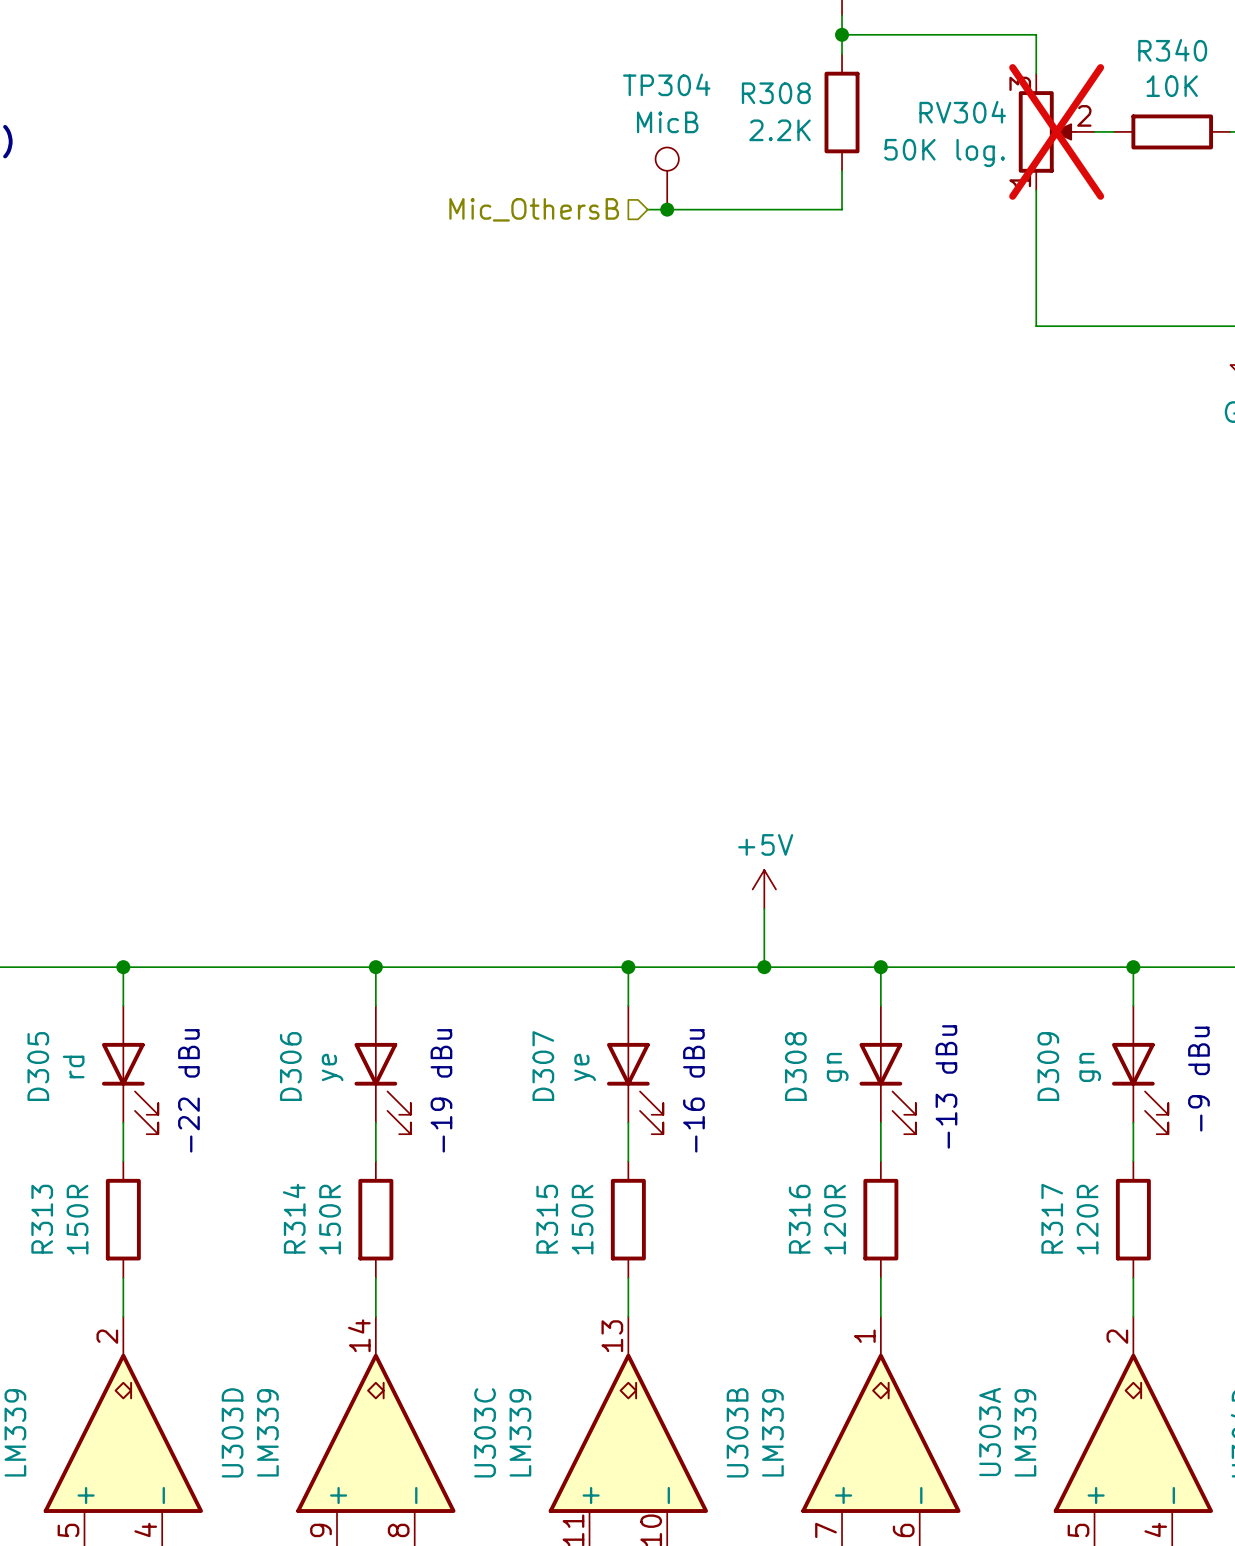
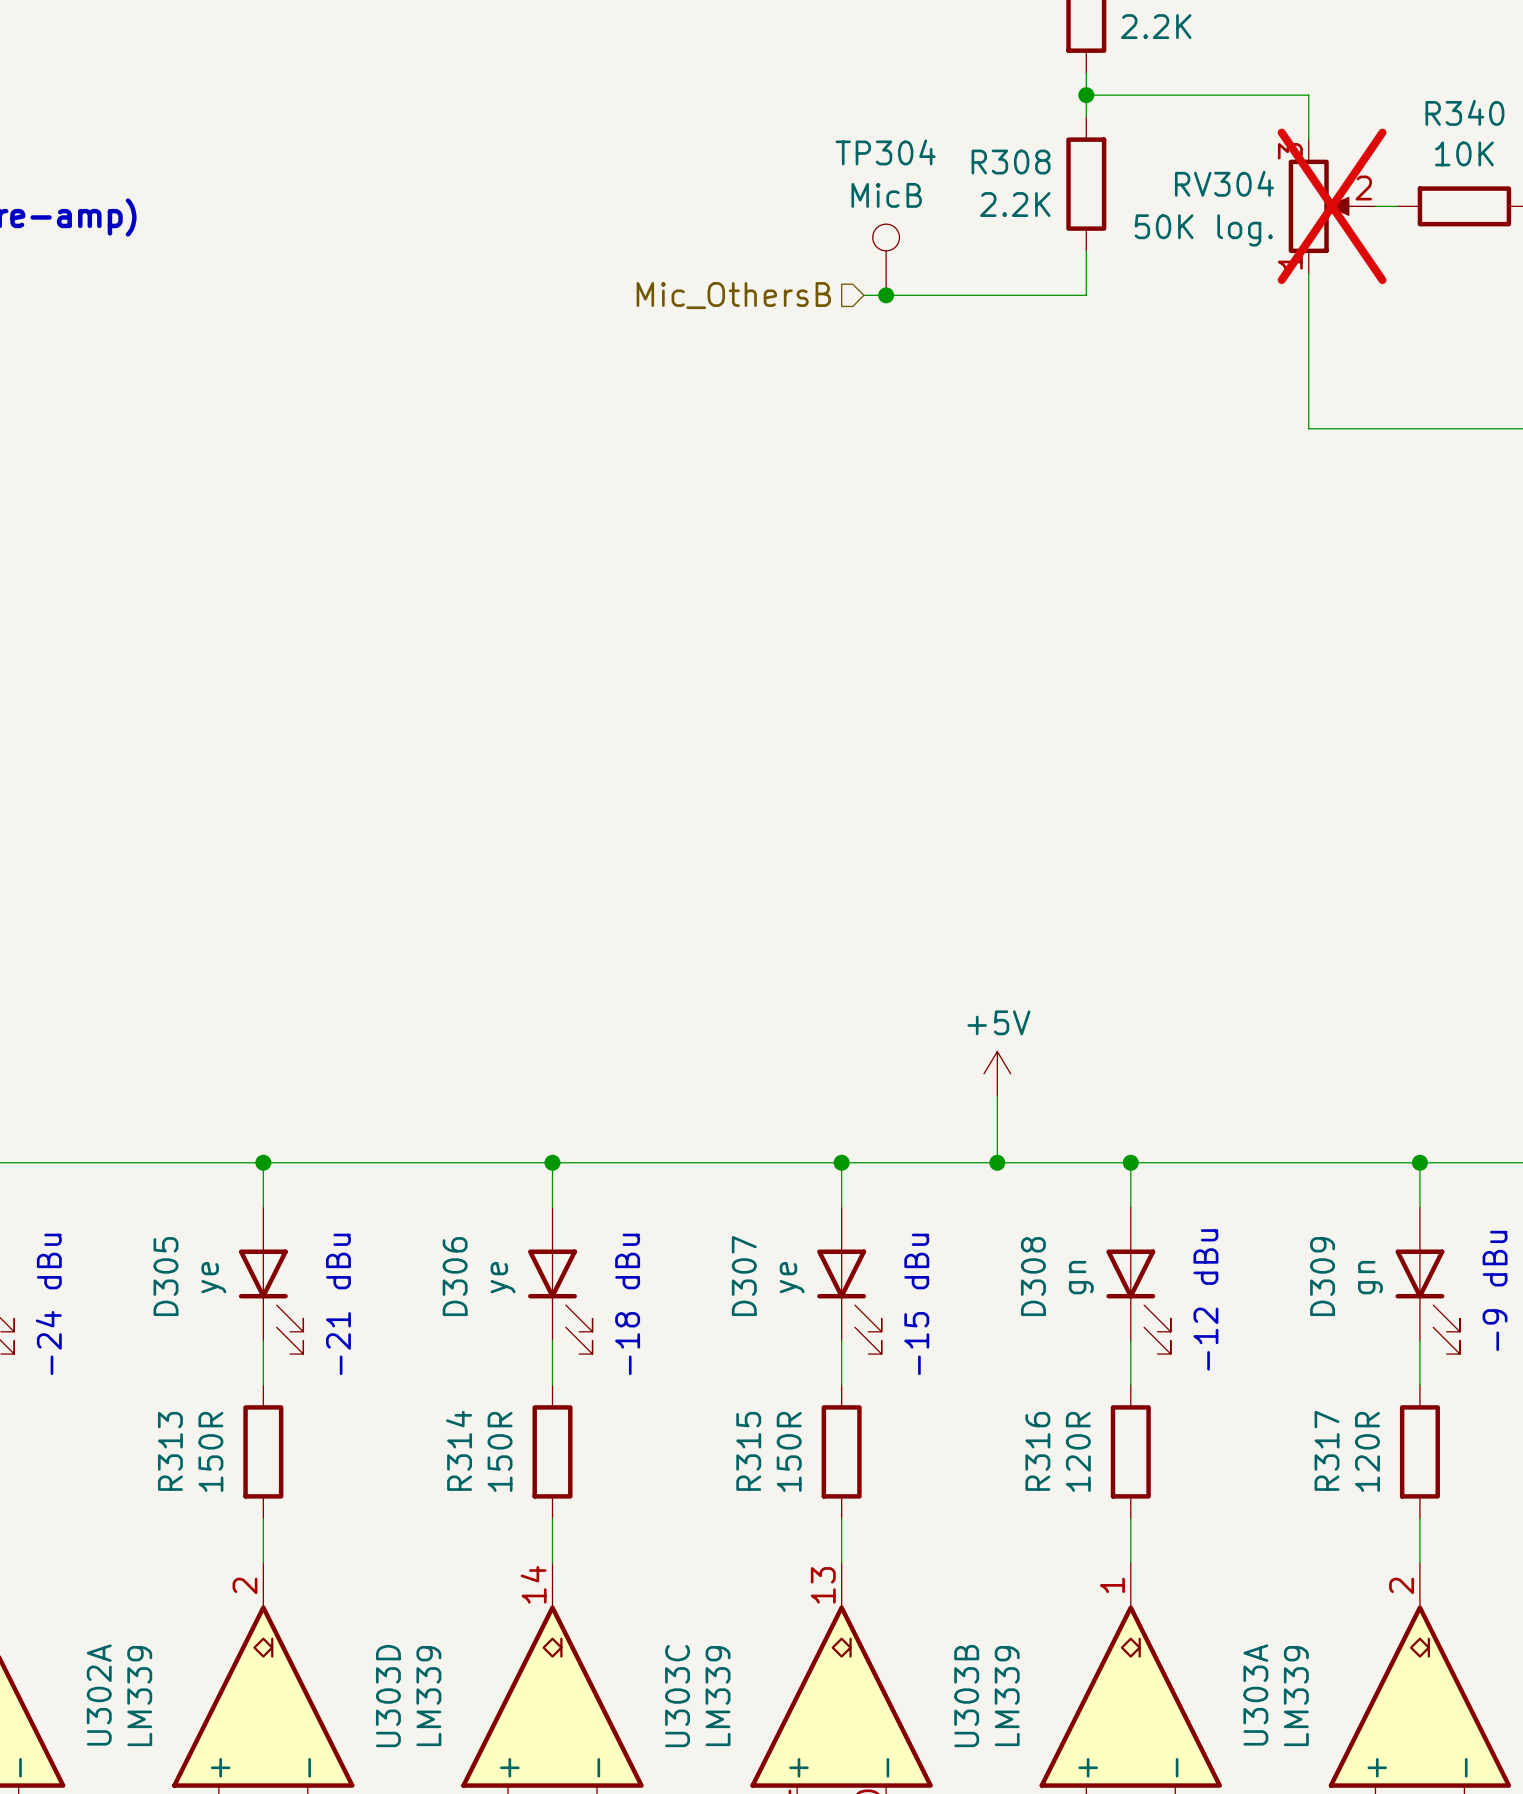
D305 value: rd (73, 1066) -> ye (213, 1277)
text: -13 dBu (946, 1086) -> -12 dBu (1205, 1299)
text: -22 dBu (188, 1090) -> -21 dBu (338, 1304)
text: -19 dBu (441, 1090) -> -18 dBu (627, 1304)
text: -16 dBu (693, 1090) -> -15 dBu (916, 1304)

